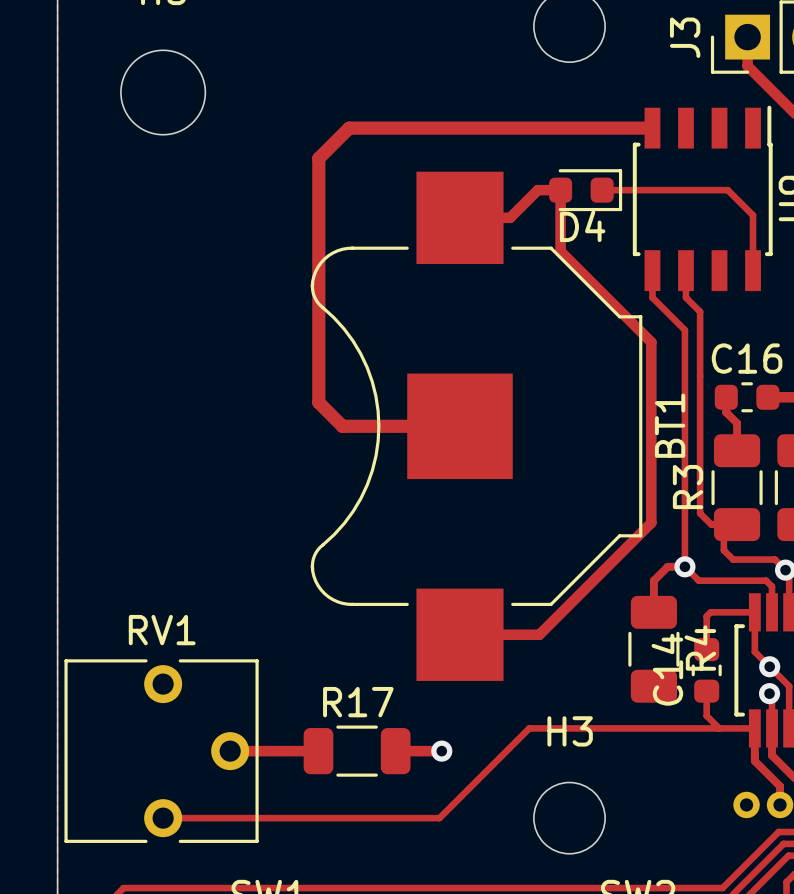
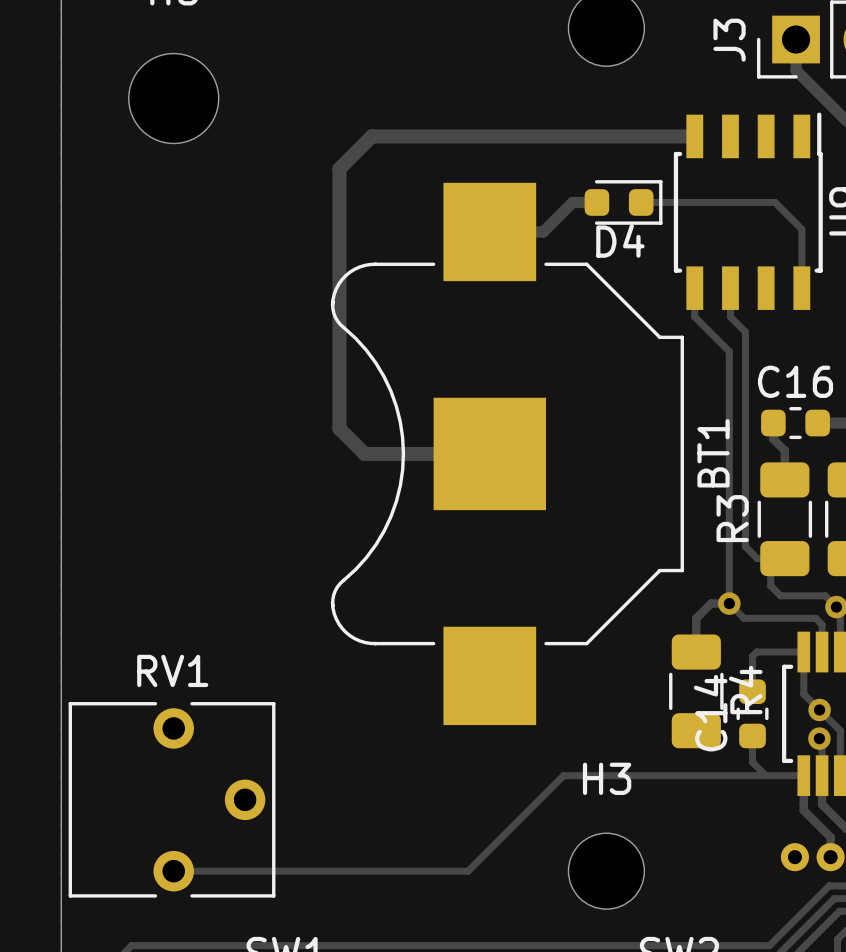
track: (560, 190) (560, 251) (651, 342) (651, 522) (539, 634) (459, 634) -> none
track: (230, 751) (318, 751) -> none
R17: (357, 751) -> none
track: (395, 751) (441, 751) -> none
via: (441, 751) -> none

